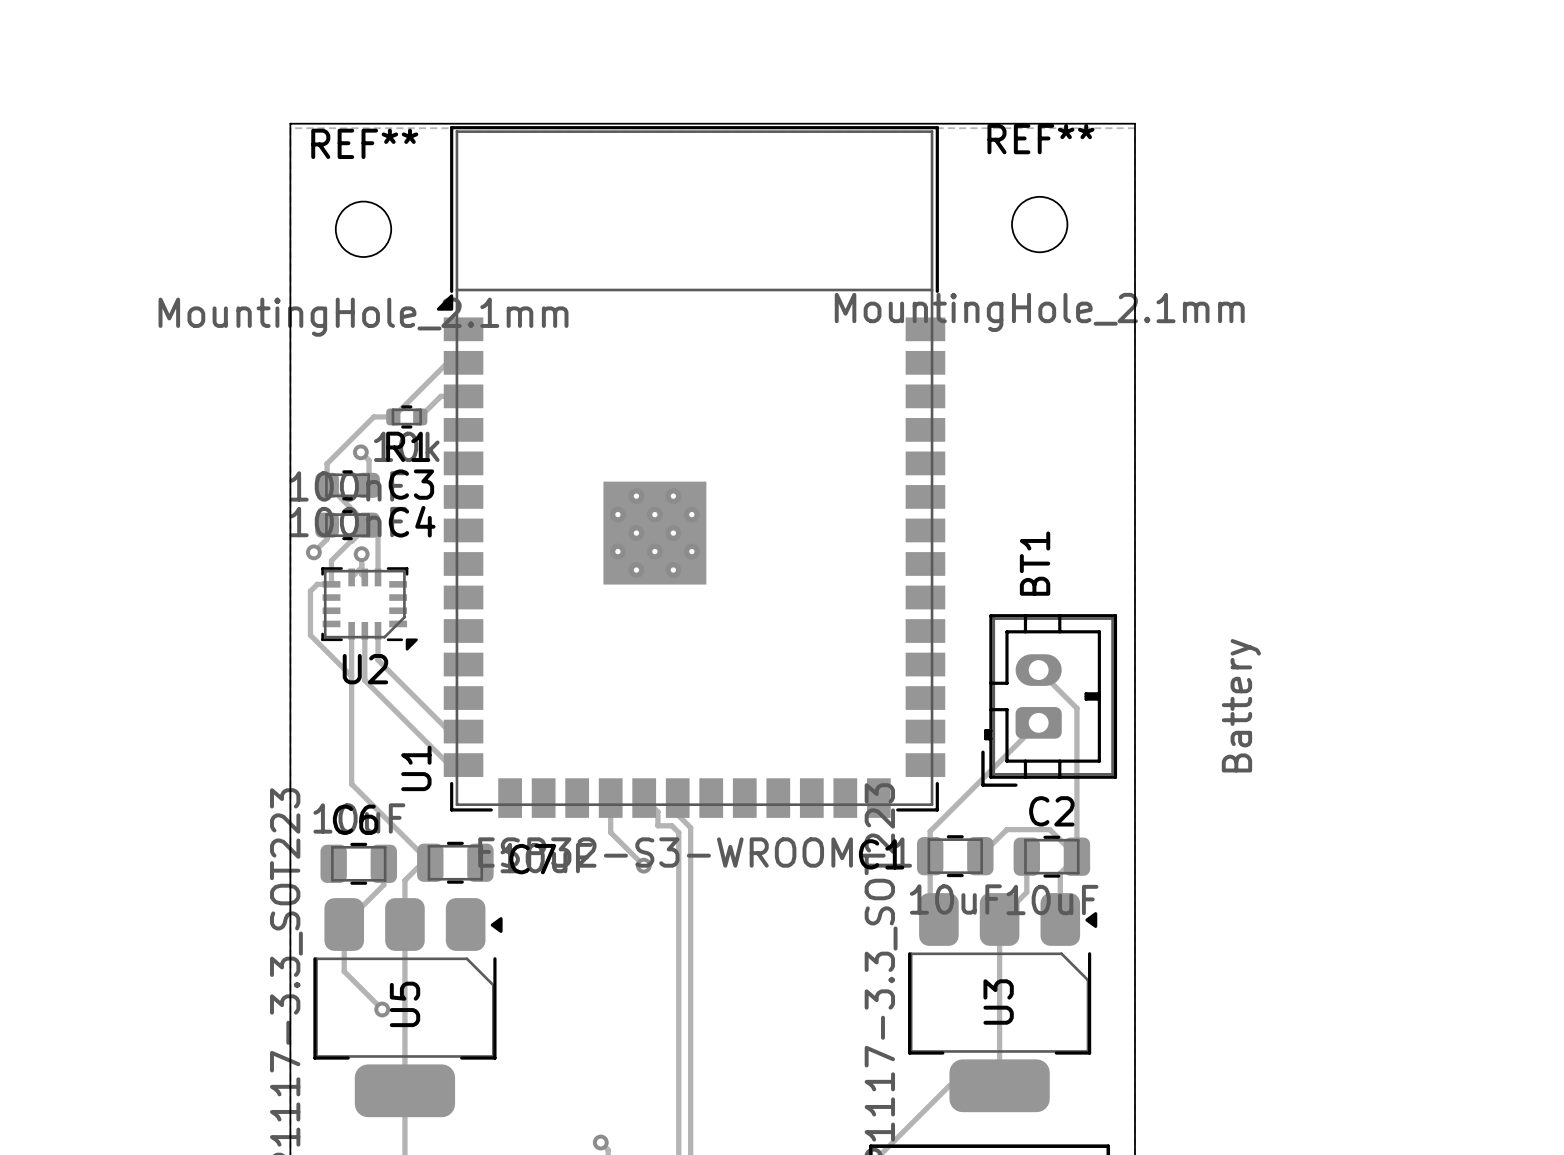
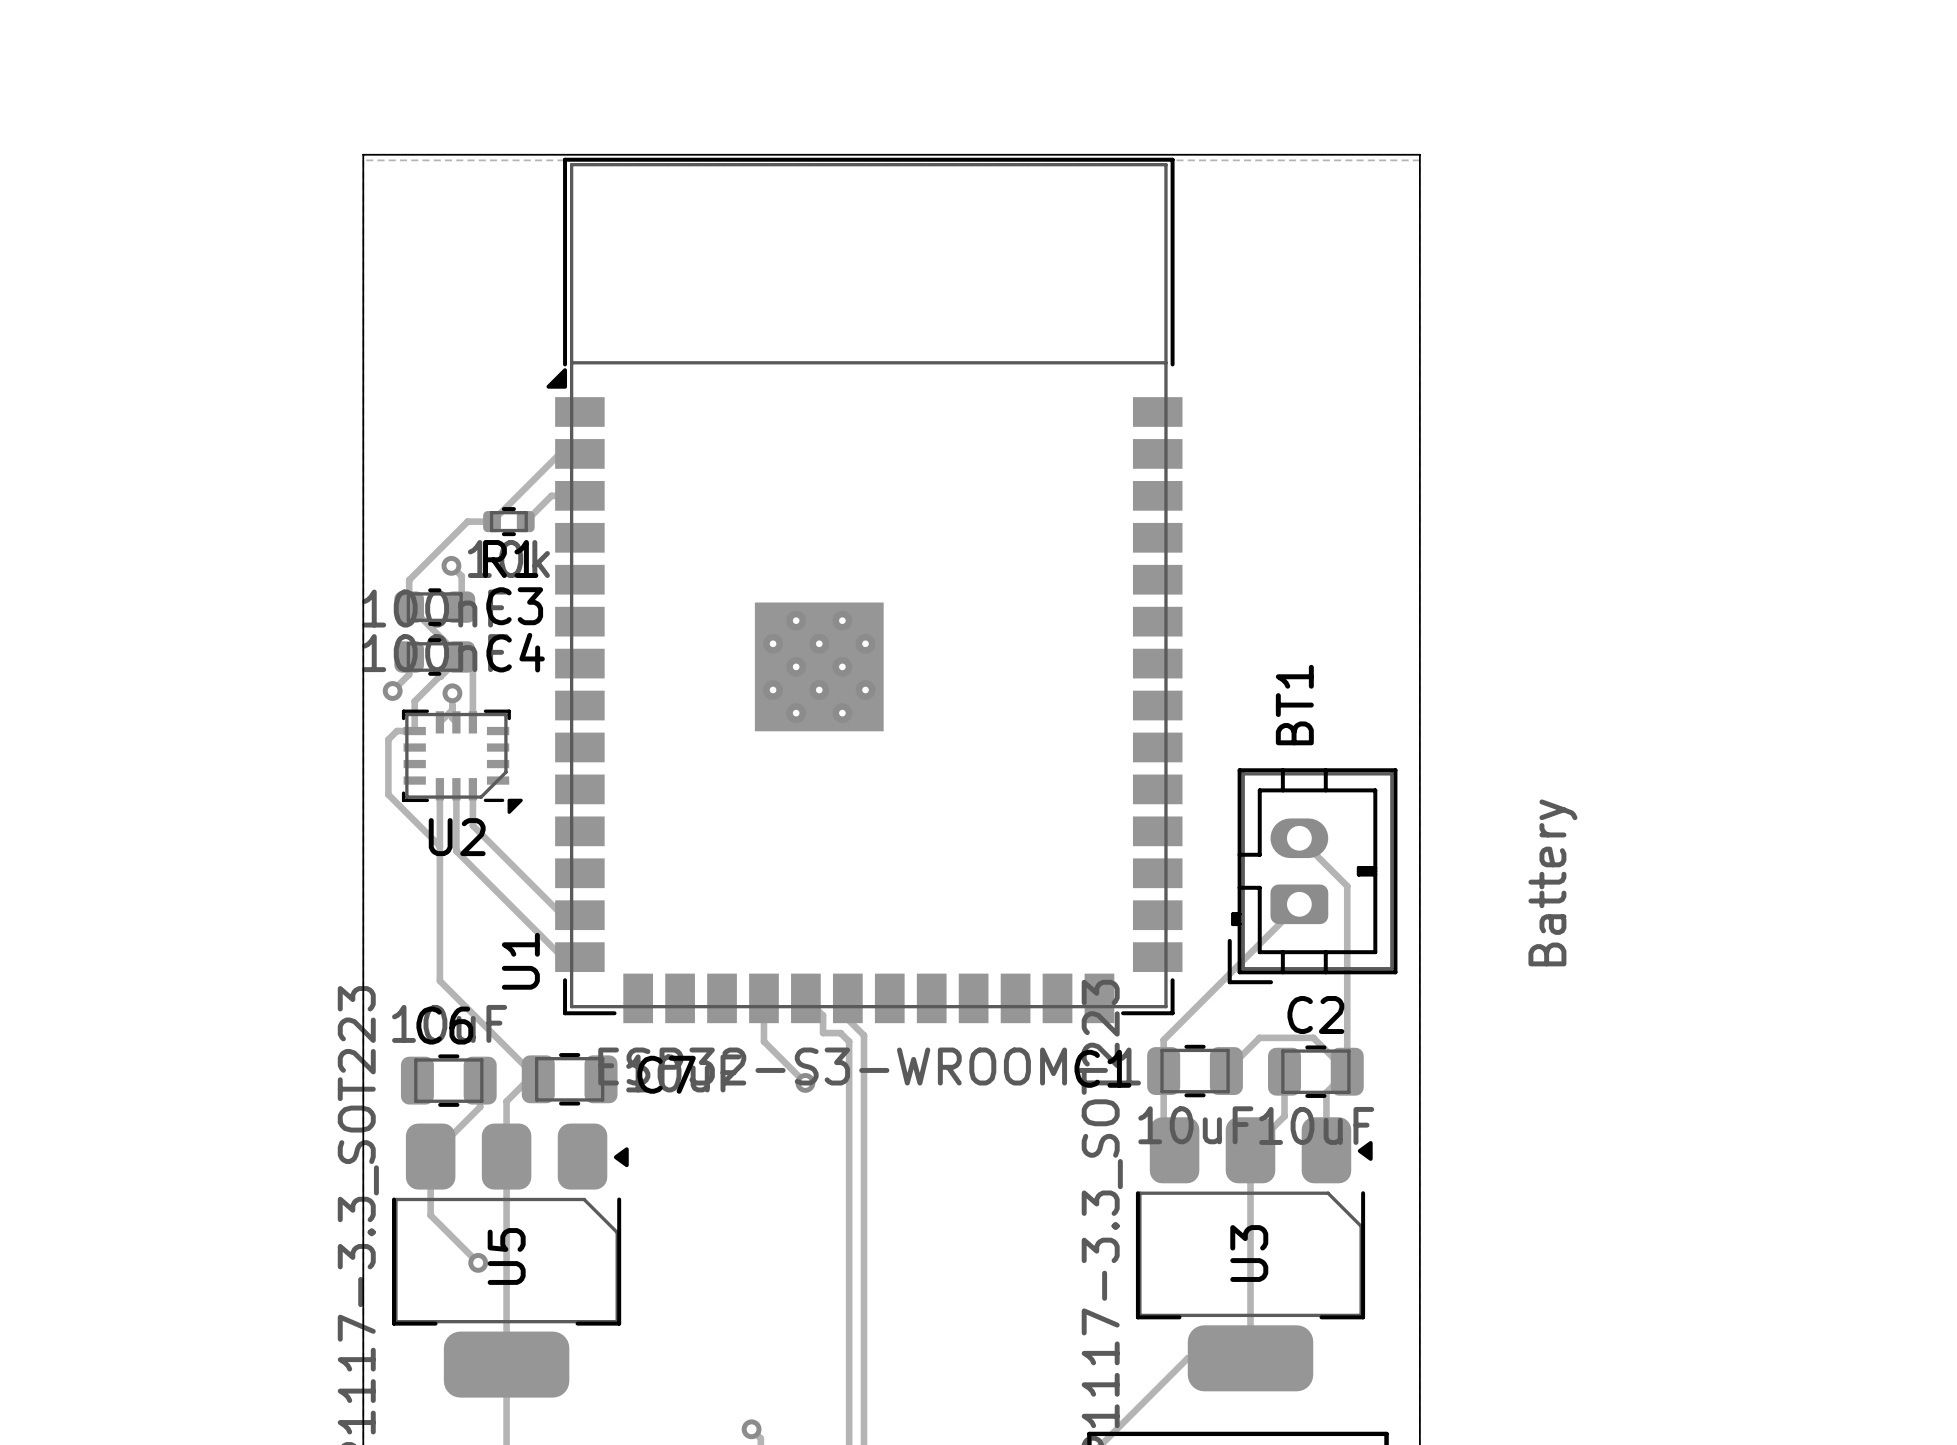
REF**: MountingHole_2.1mm (1039, 224) -> none
REF**: MountingHole_2.1mm (363, 229) -> none

